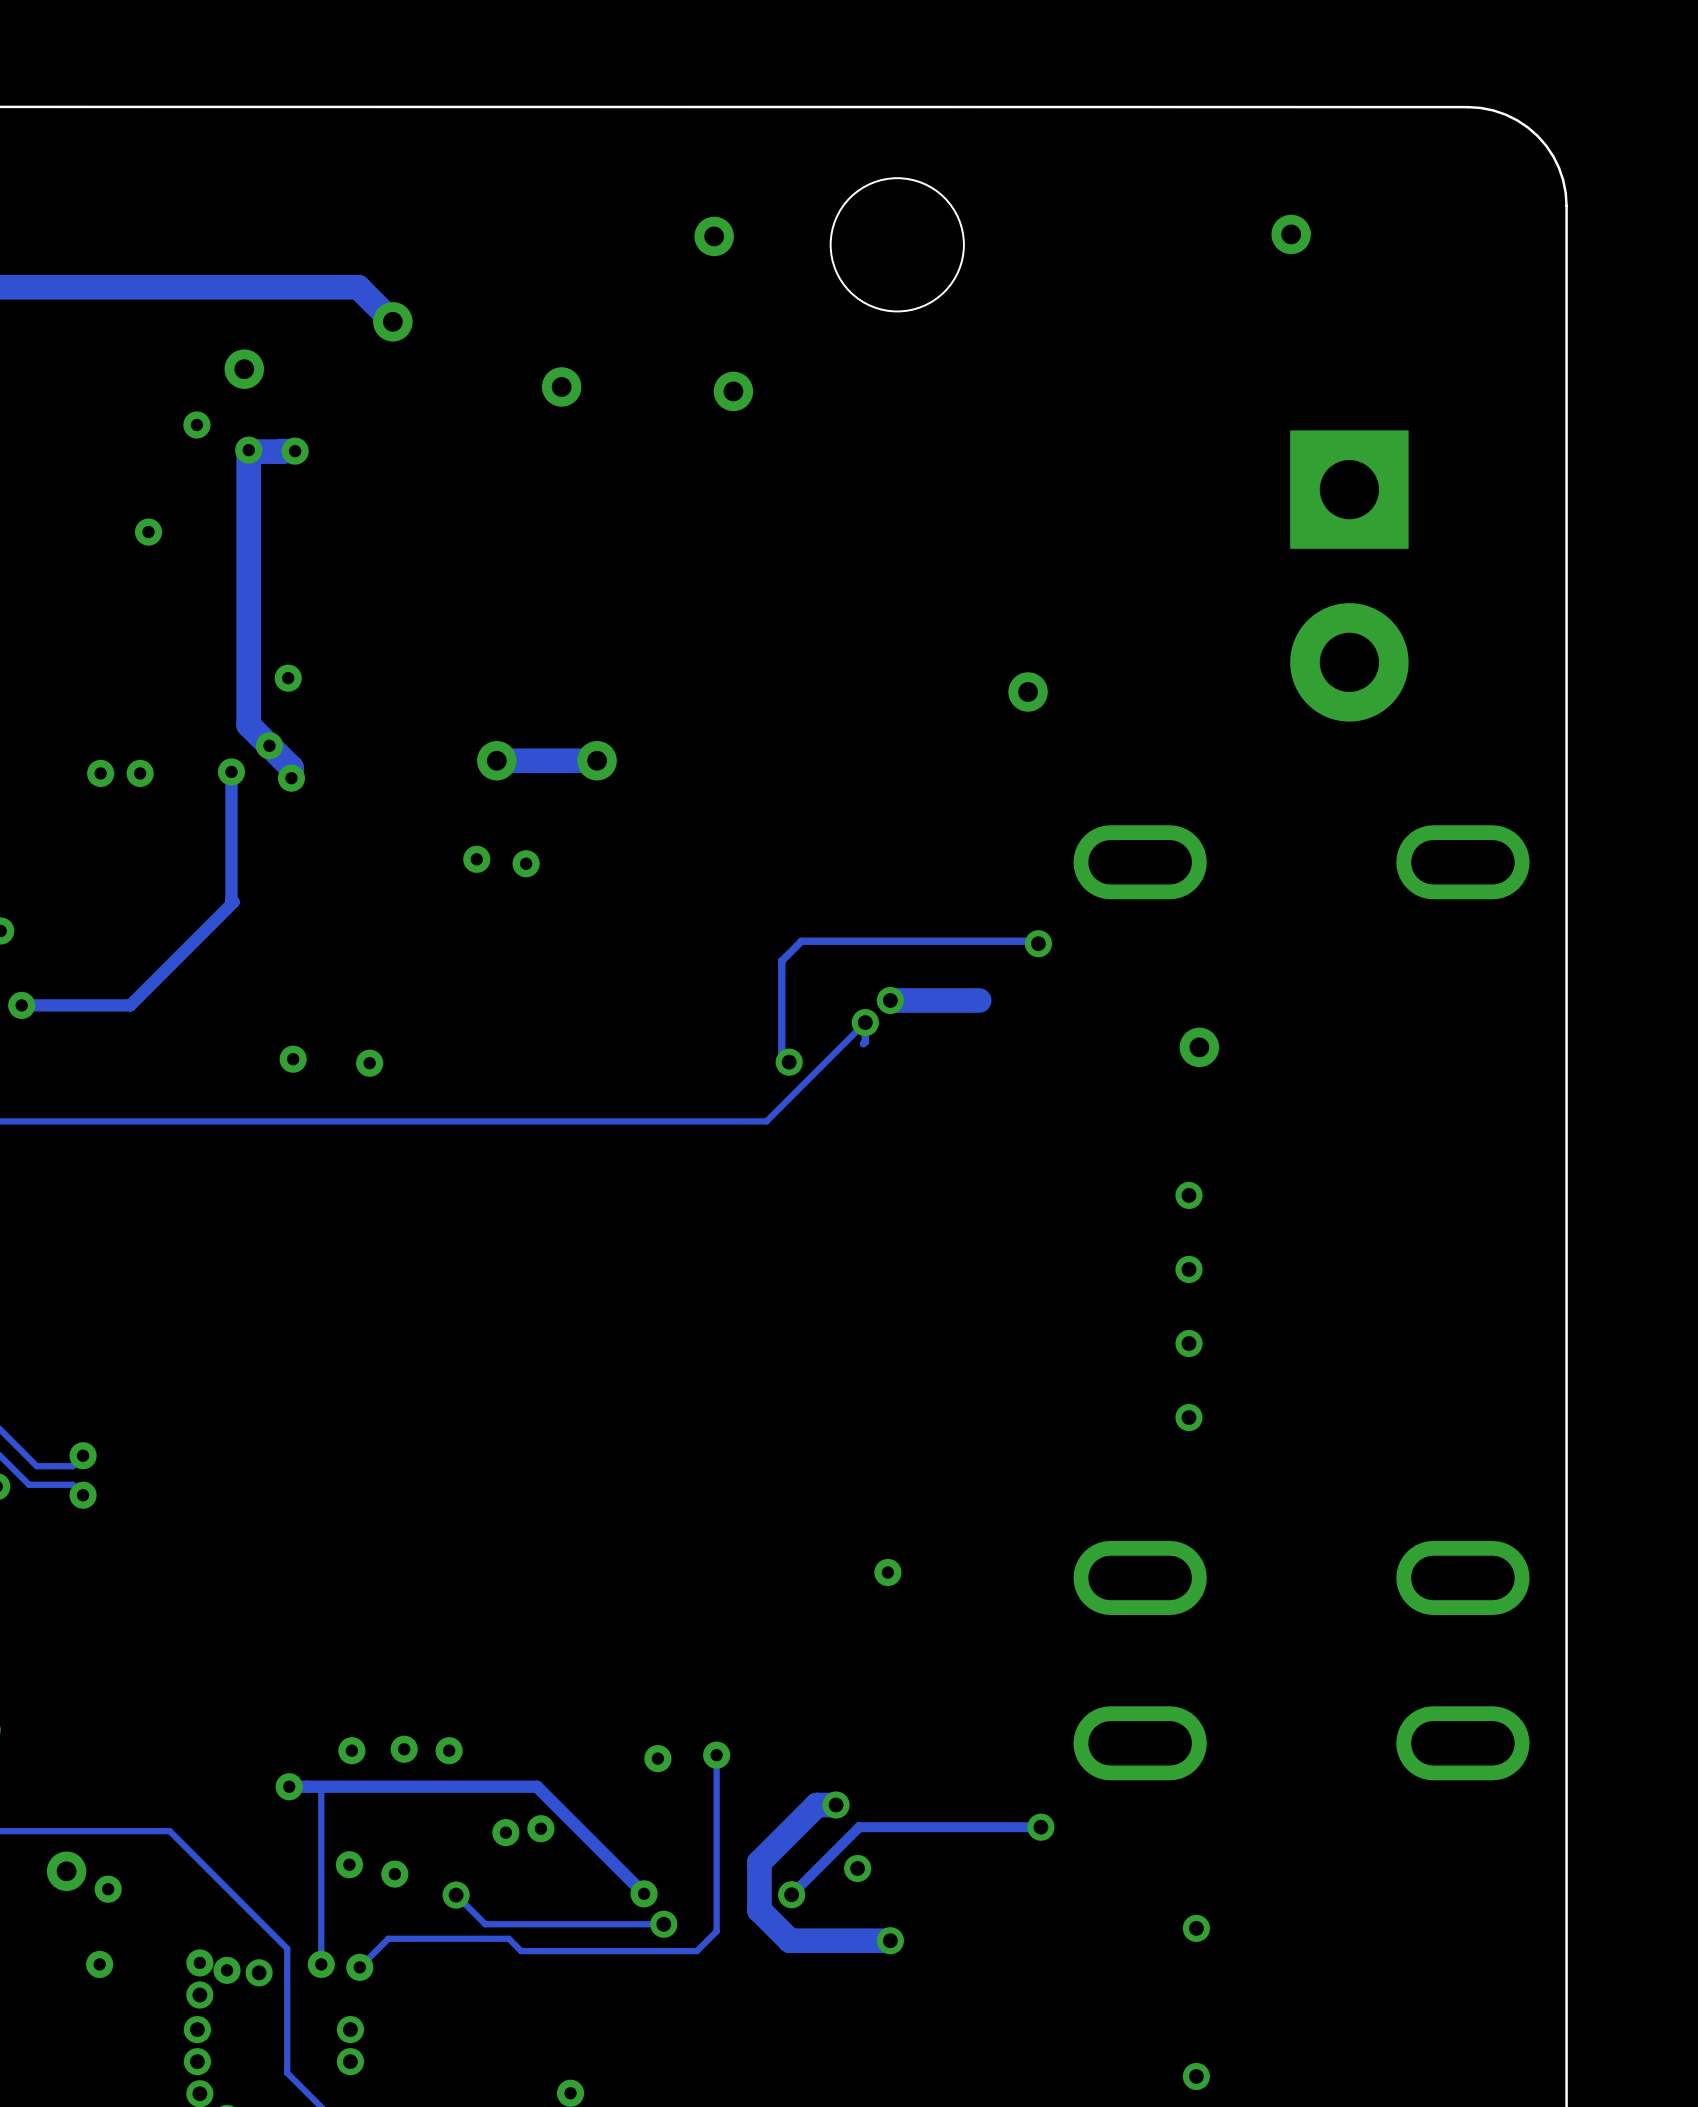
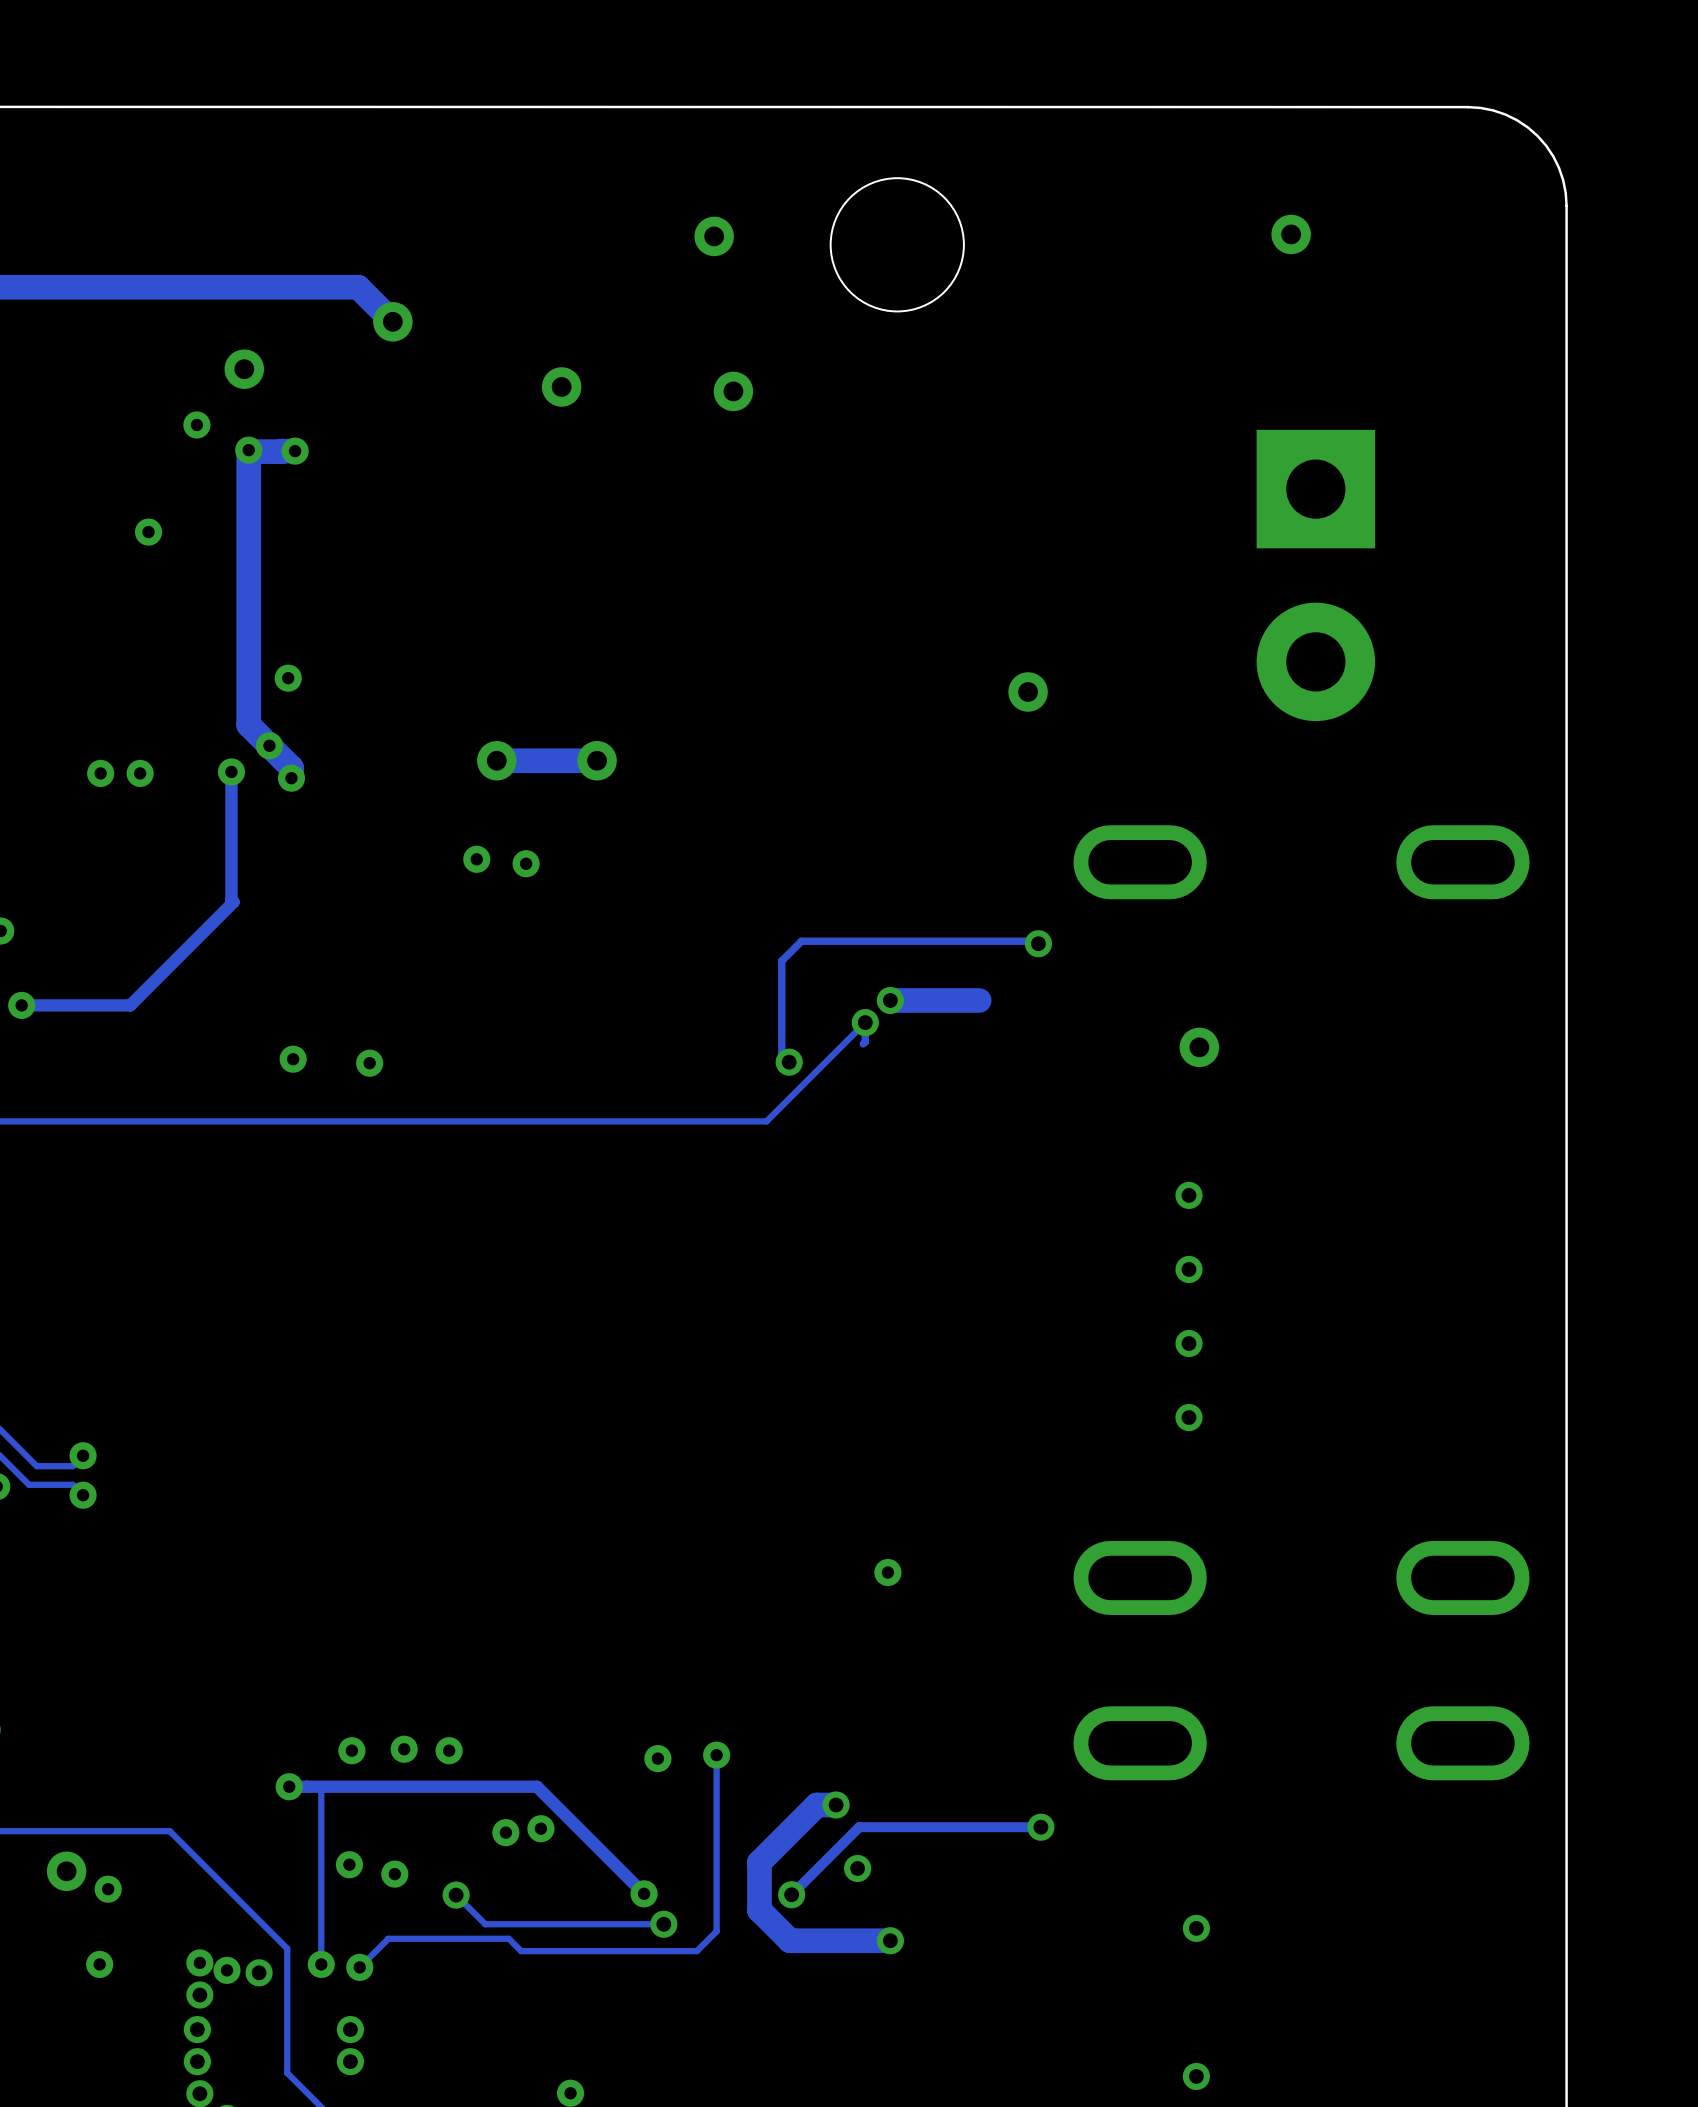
part position: (1349, 576) -> (1315, 575)

